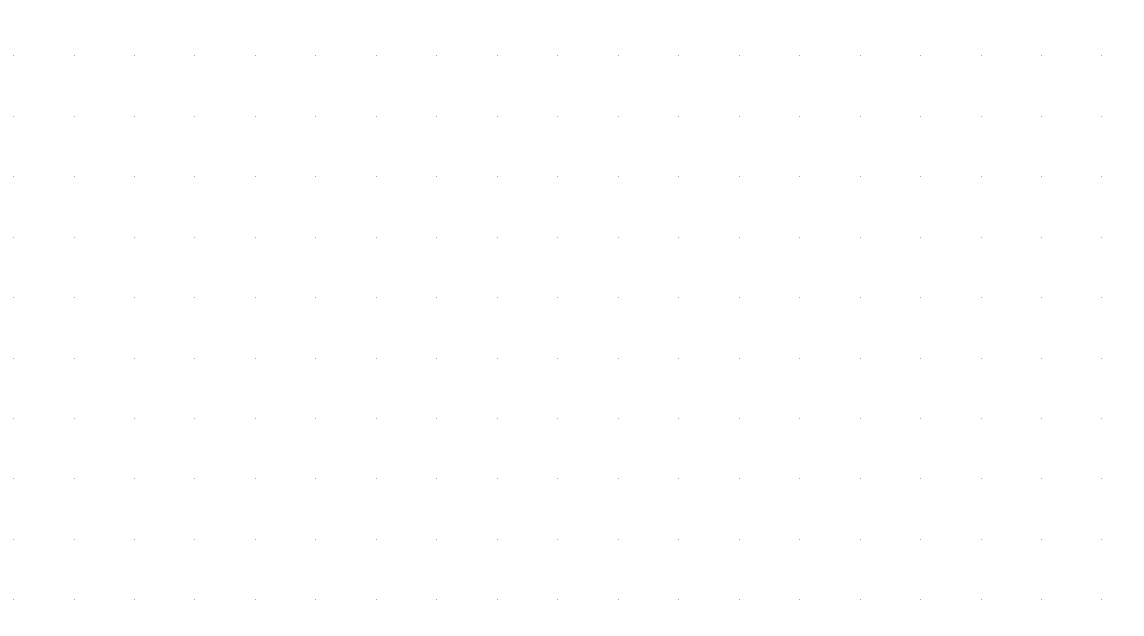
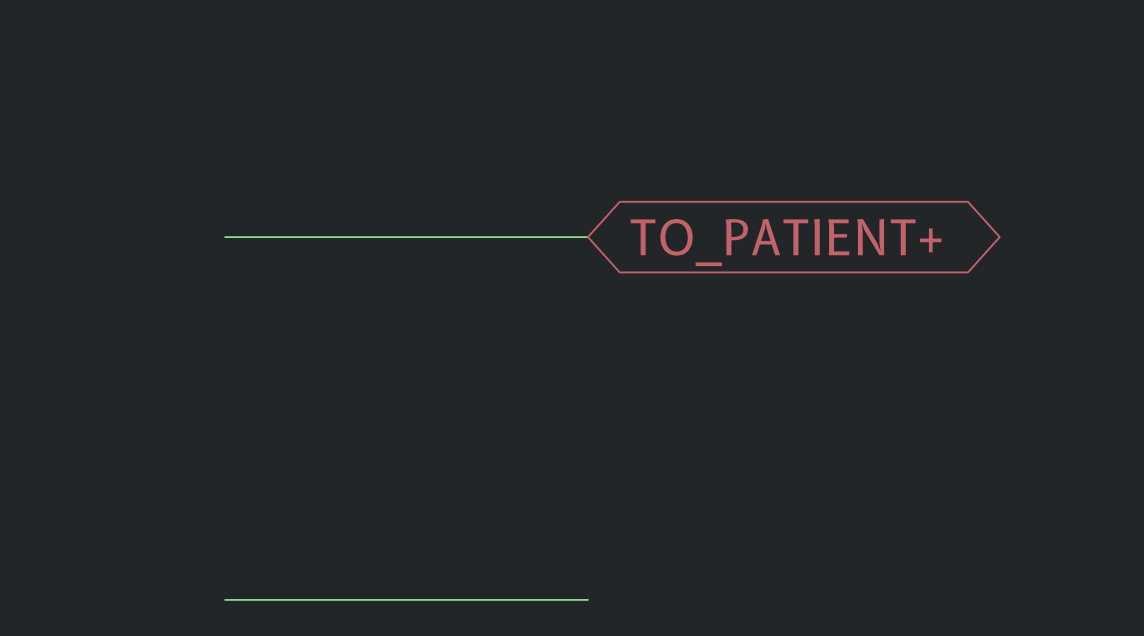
wire: none -> (225, 237) (587, 237)
global label: none -> TO_PATIENT+ (786, 242)
wire: none -> (225, 599) (587, 599)

